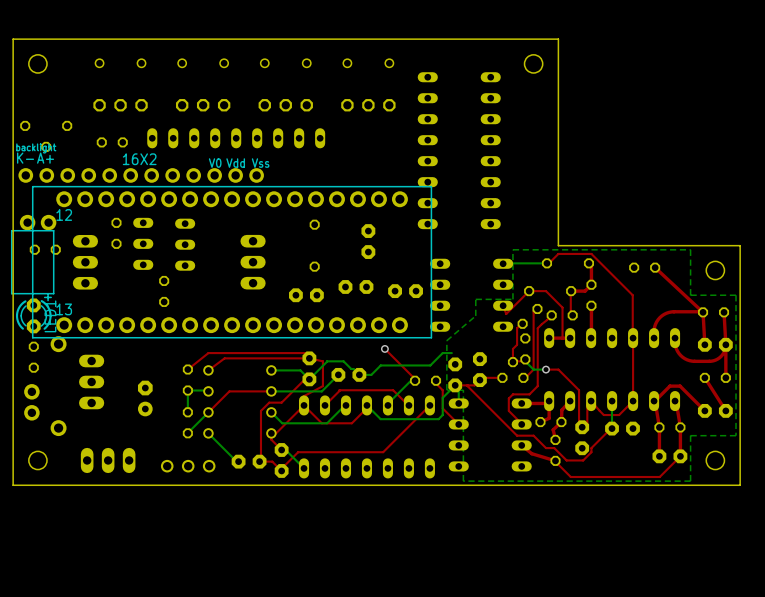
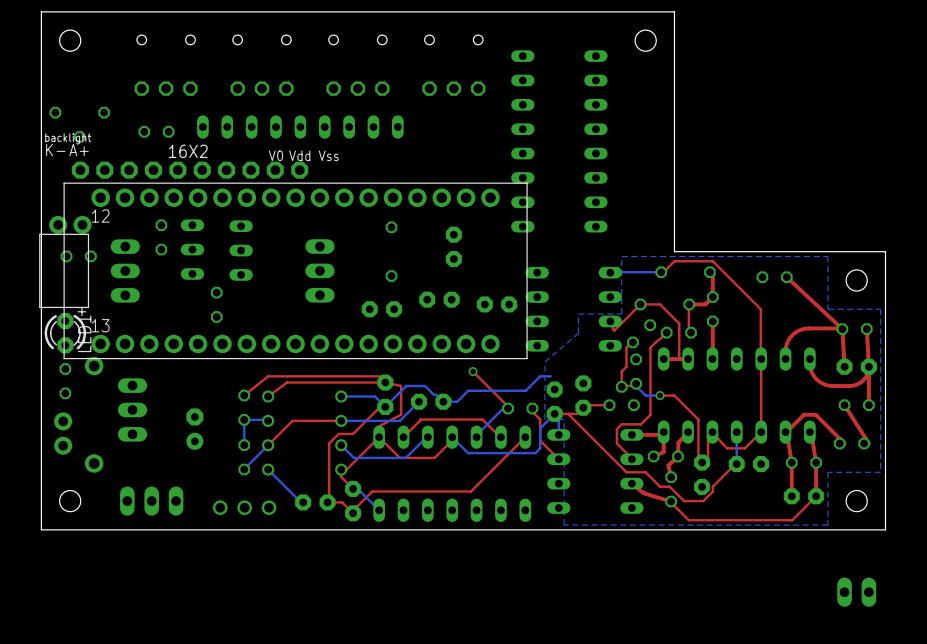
16X2 footprint: [18, 168, 264, 183] -> [71, 161, 309, 179]
top track: (537, 308) (533, 311) (533, 369) (523, 377) -> none
part footprint: [697, 403, 733, 418] -> [833, 437, 870, 450]
part: none -> (856, 592)

